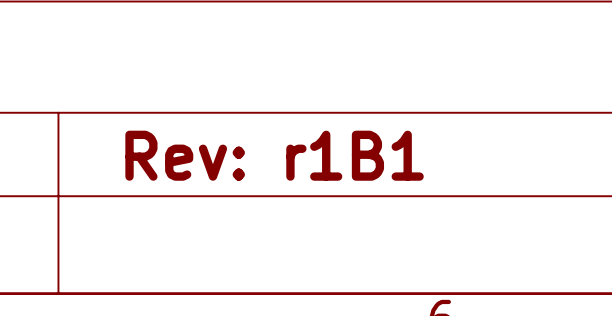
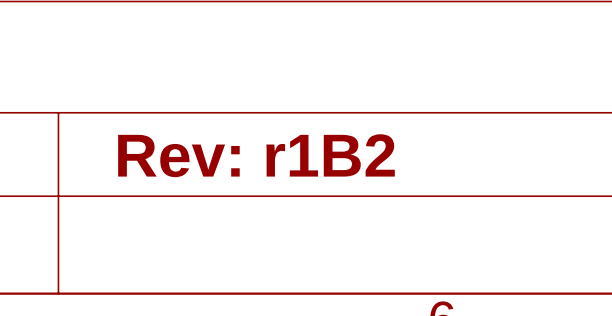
title block: Rev: r1B1 (274, 155) -> Rev: r1B2 (256, 155)

